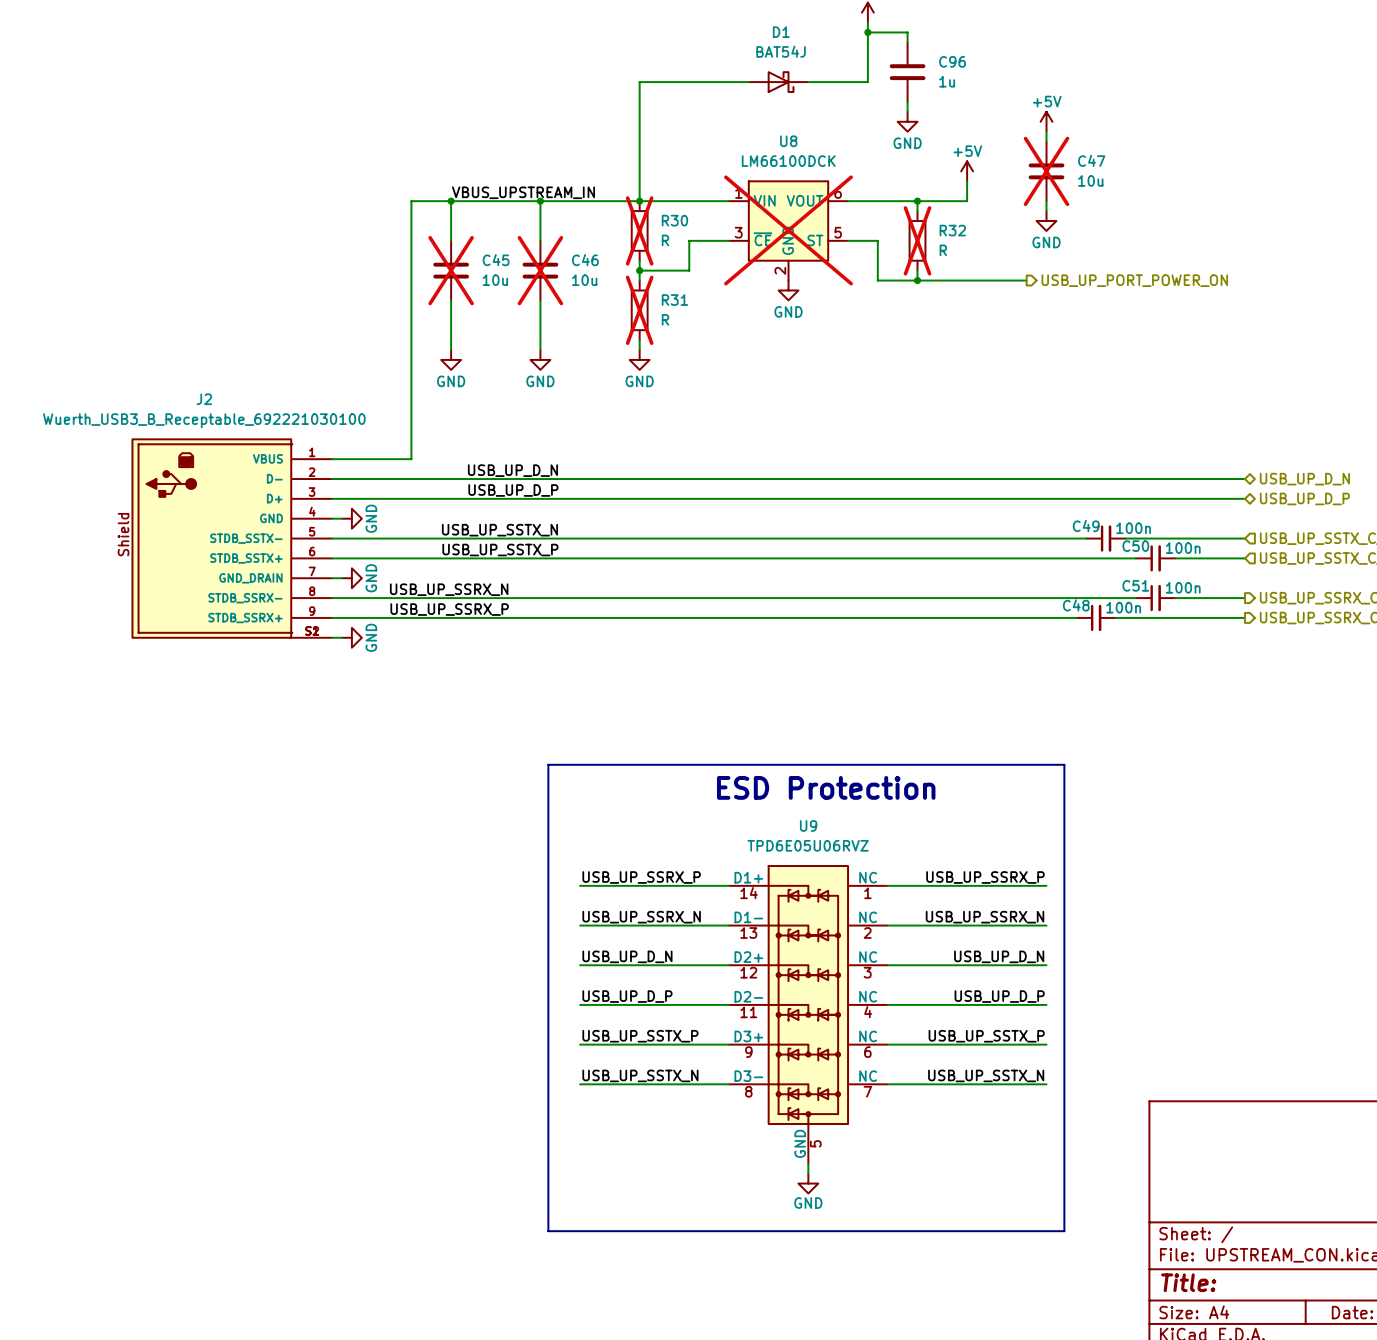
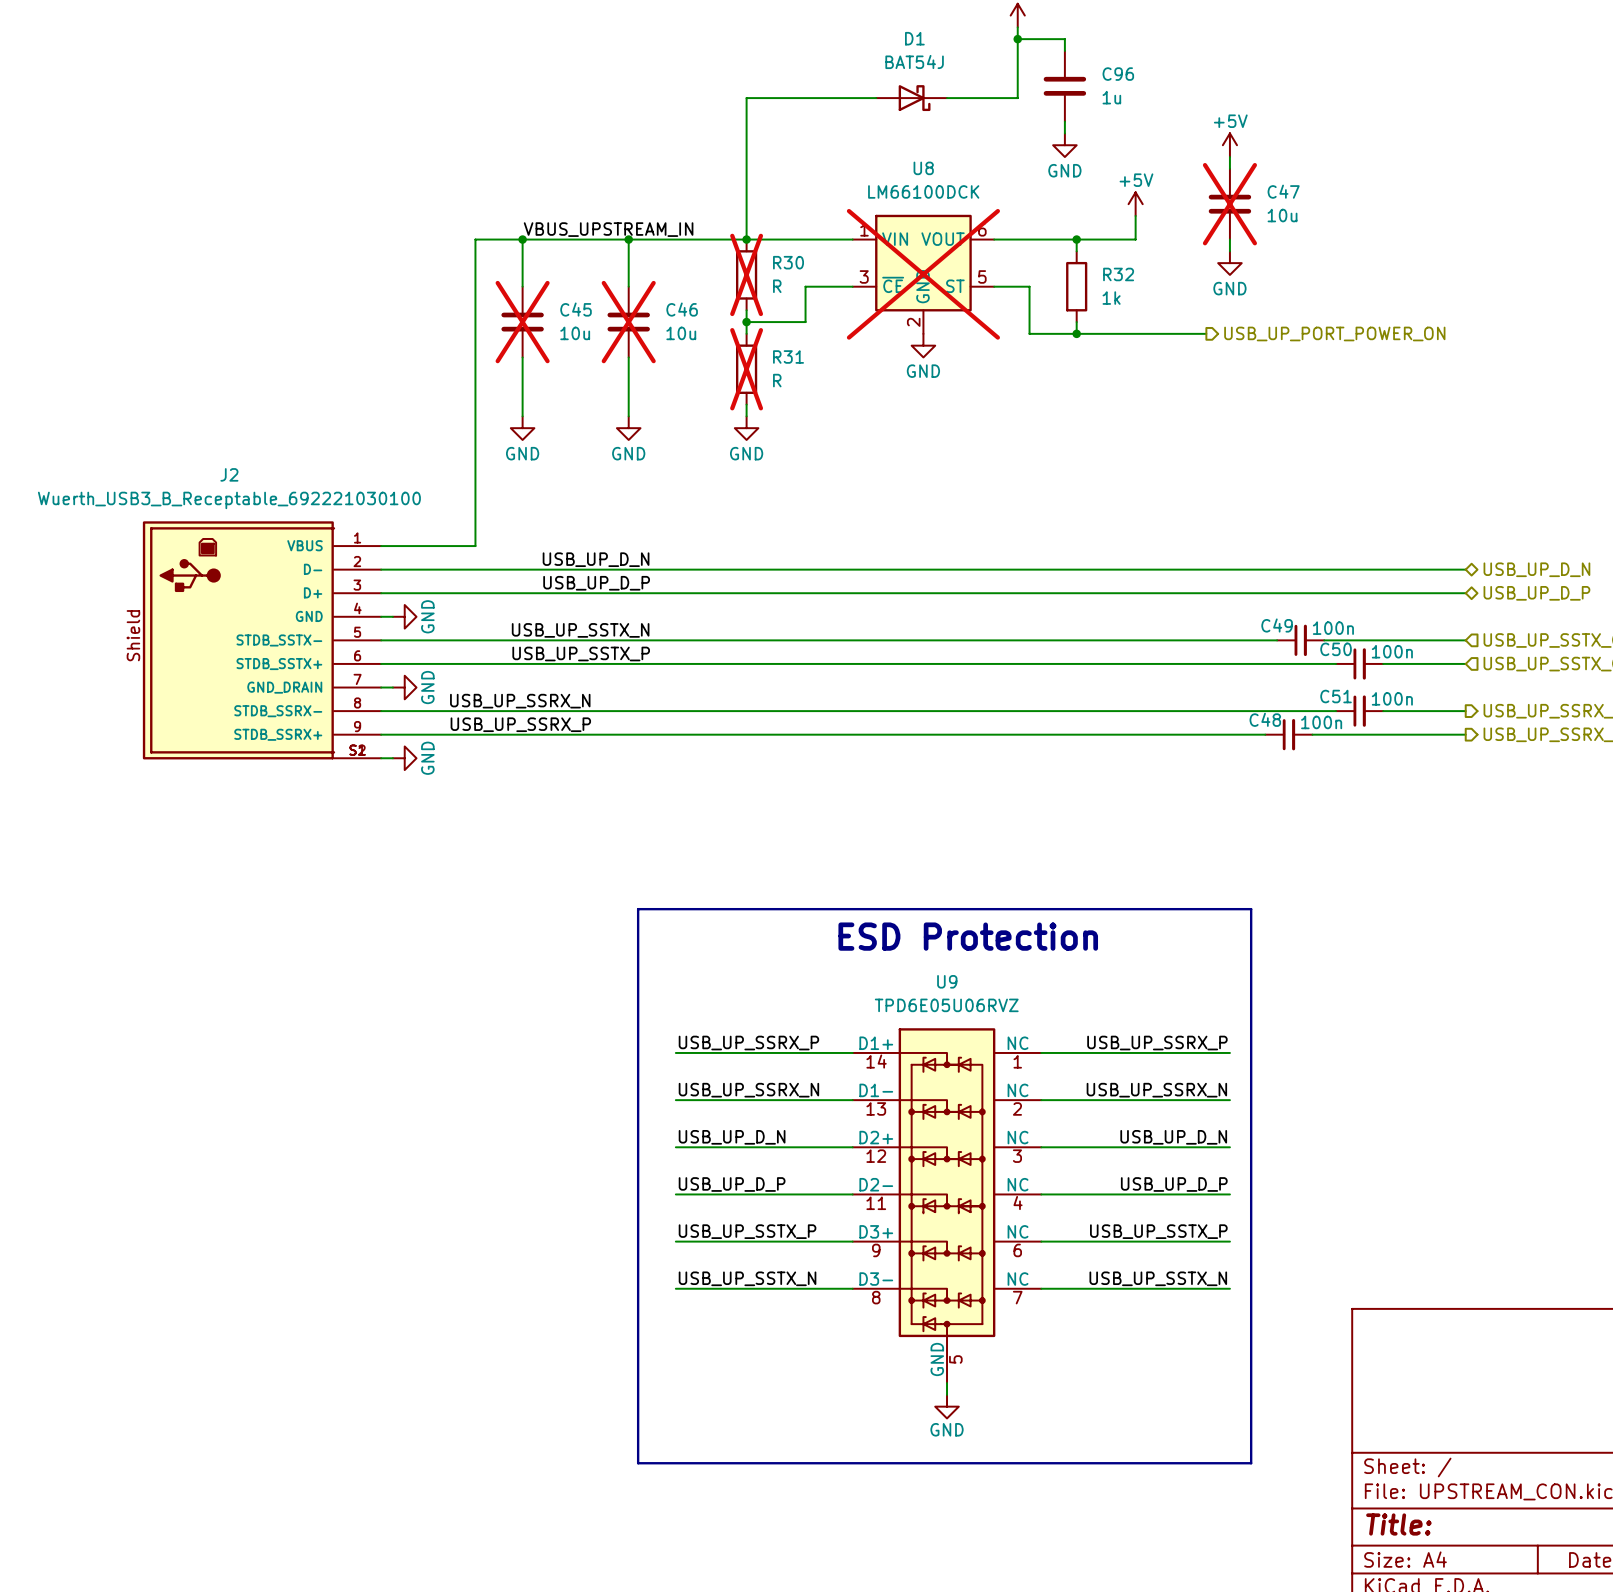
R32 do-not-place cross: (917, 240) -> none
R32 value: R (943, 250) -> 1k (1111, 298)

